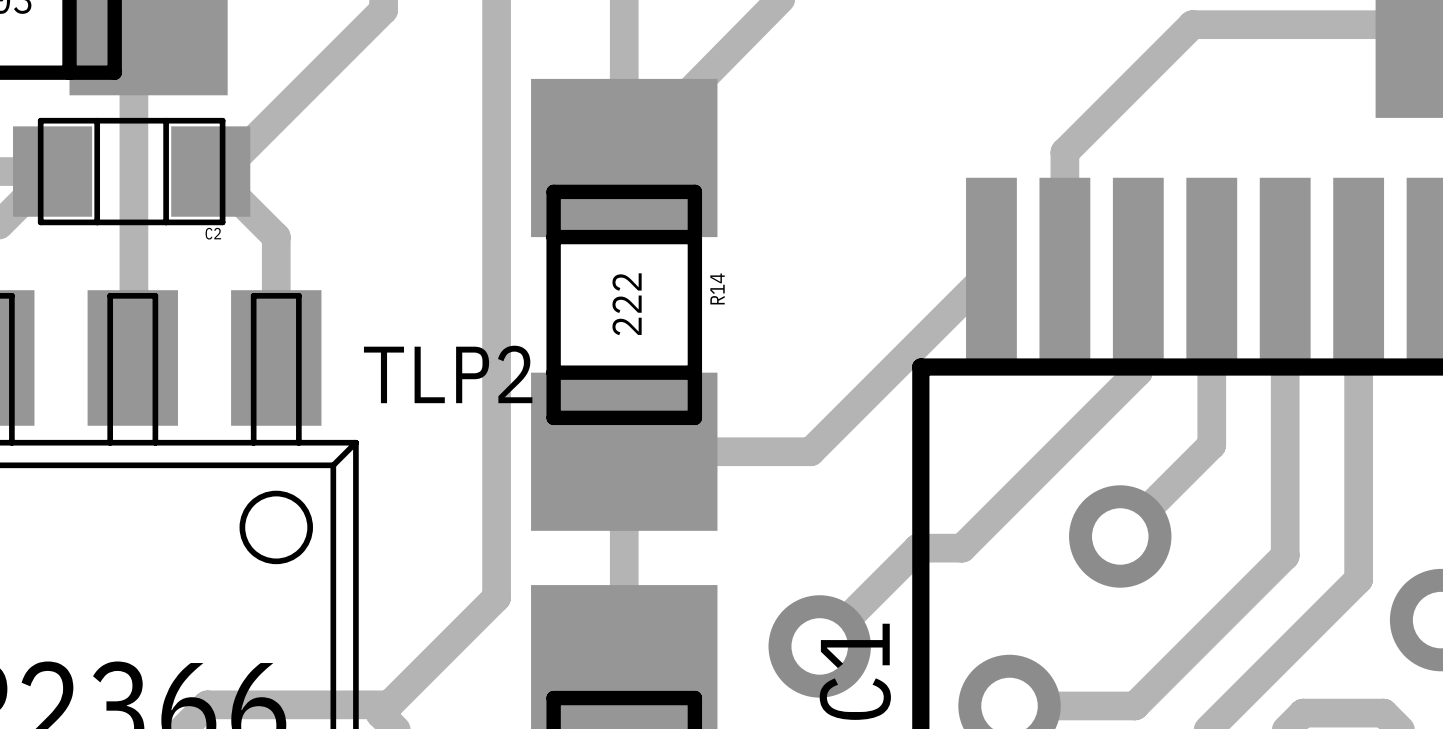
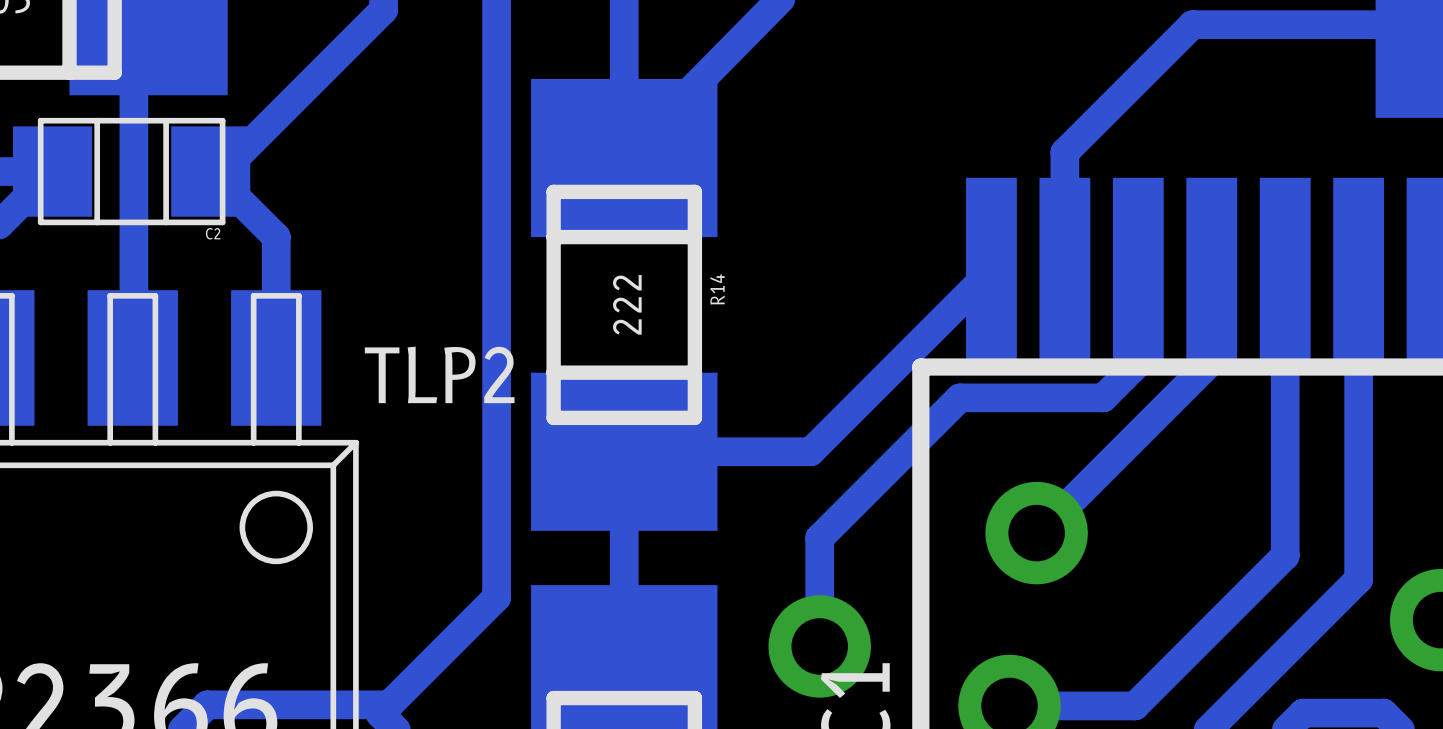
track: (1211, 360) (1211, 444) (1120, 536) -> (1211, 360) (1039, 533) (1036, 533)
track: (1138, 362) (1138, 371) (962, 548) (918, 548) (819, 646) -> (1138, 362) (1103, 397) (959, 397) (819, 537) (819, 646)
via position: (1120, 536) -> (1036, 533)

